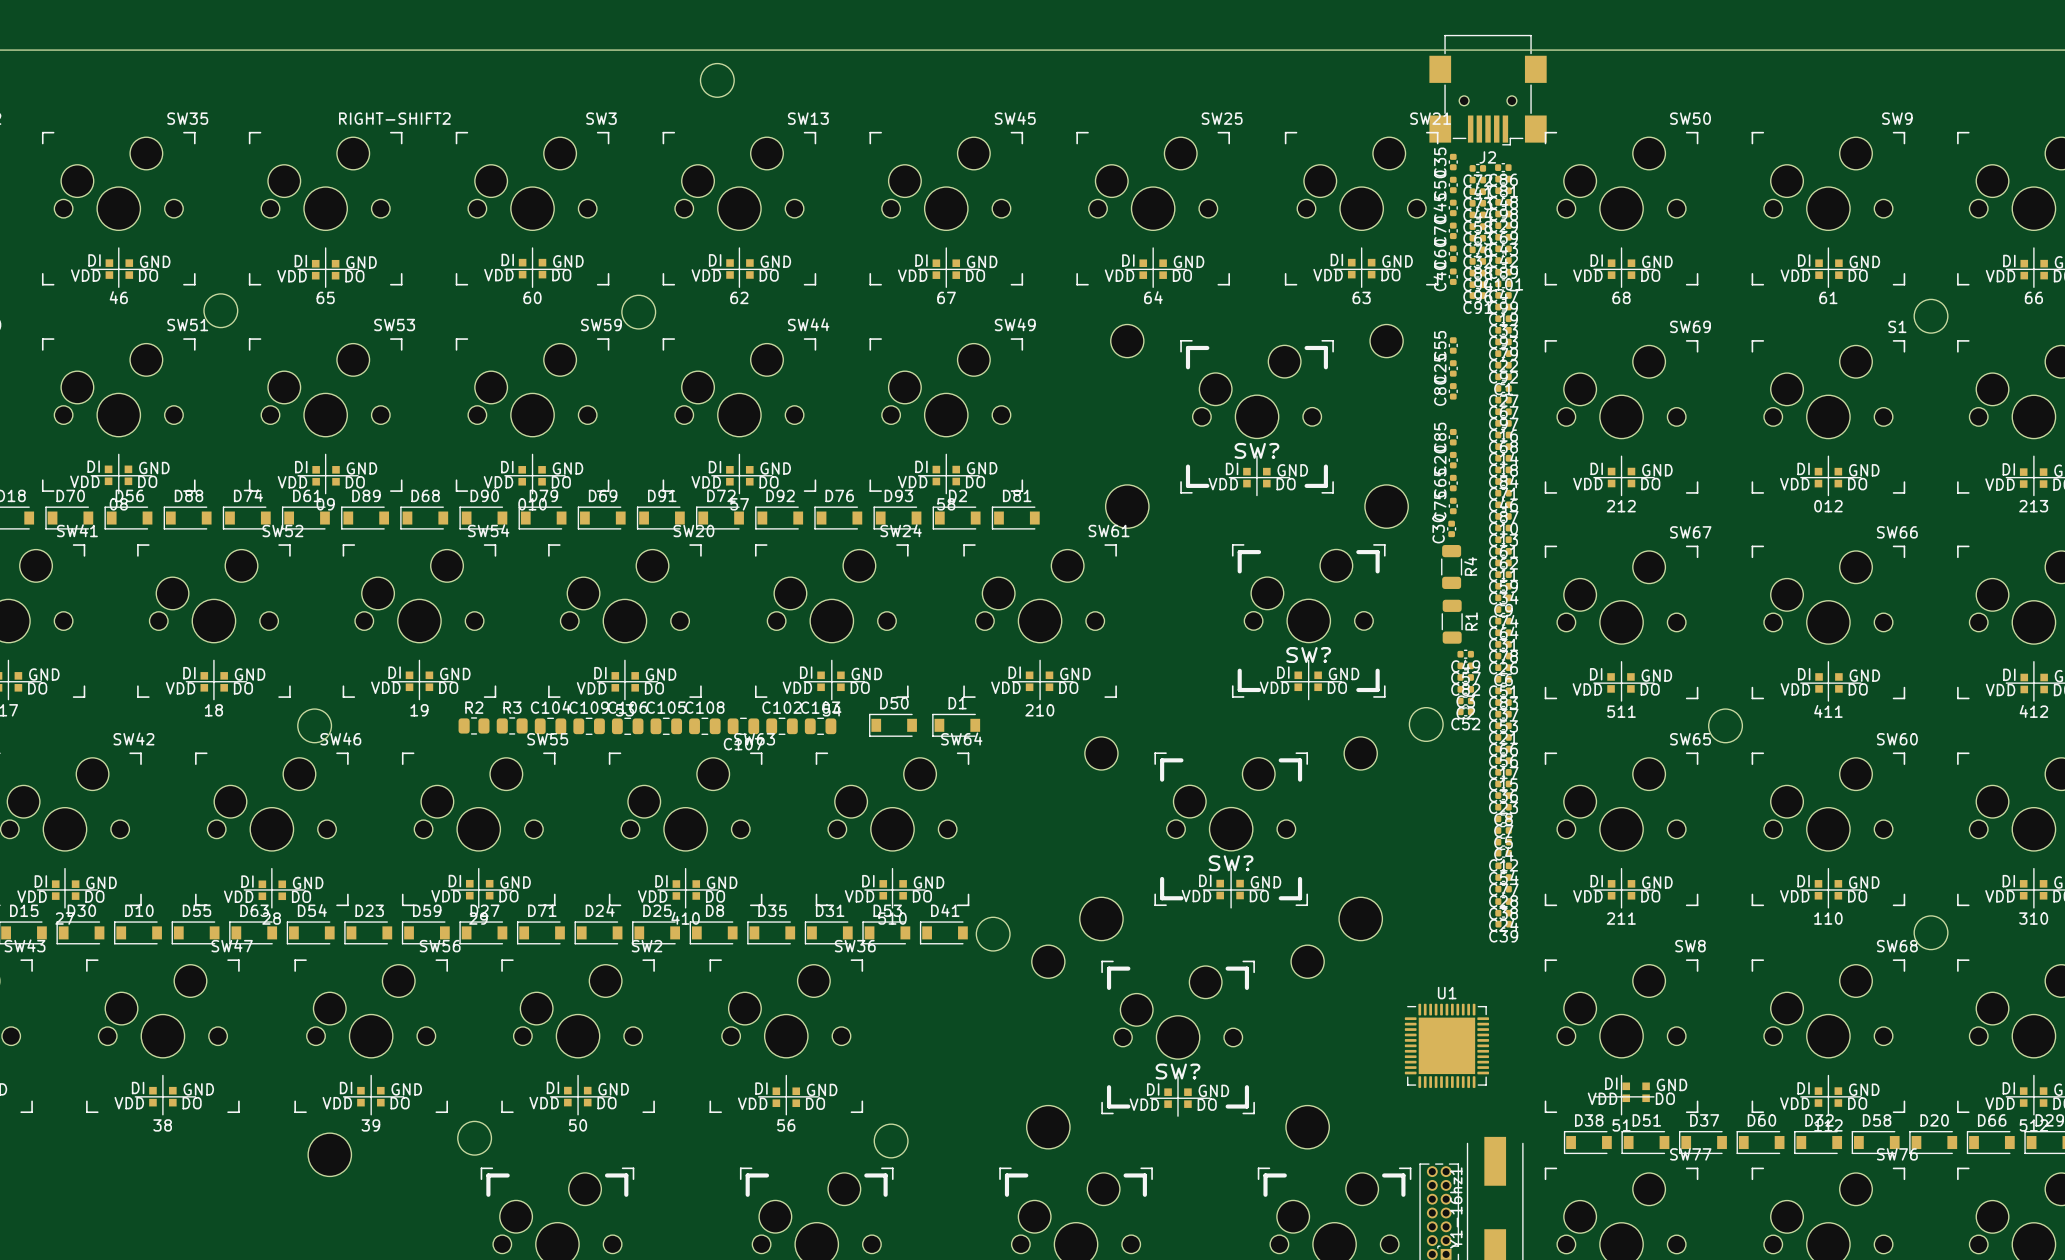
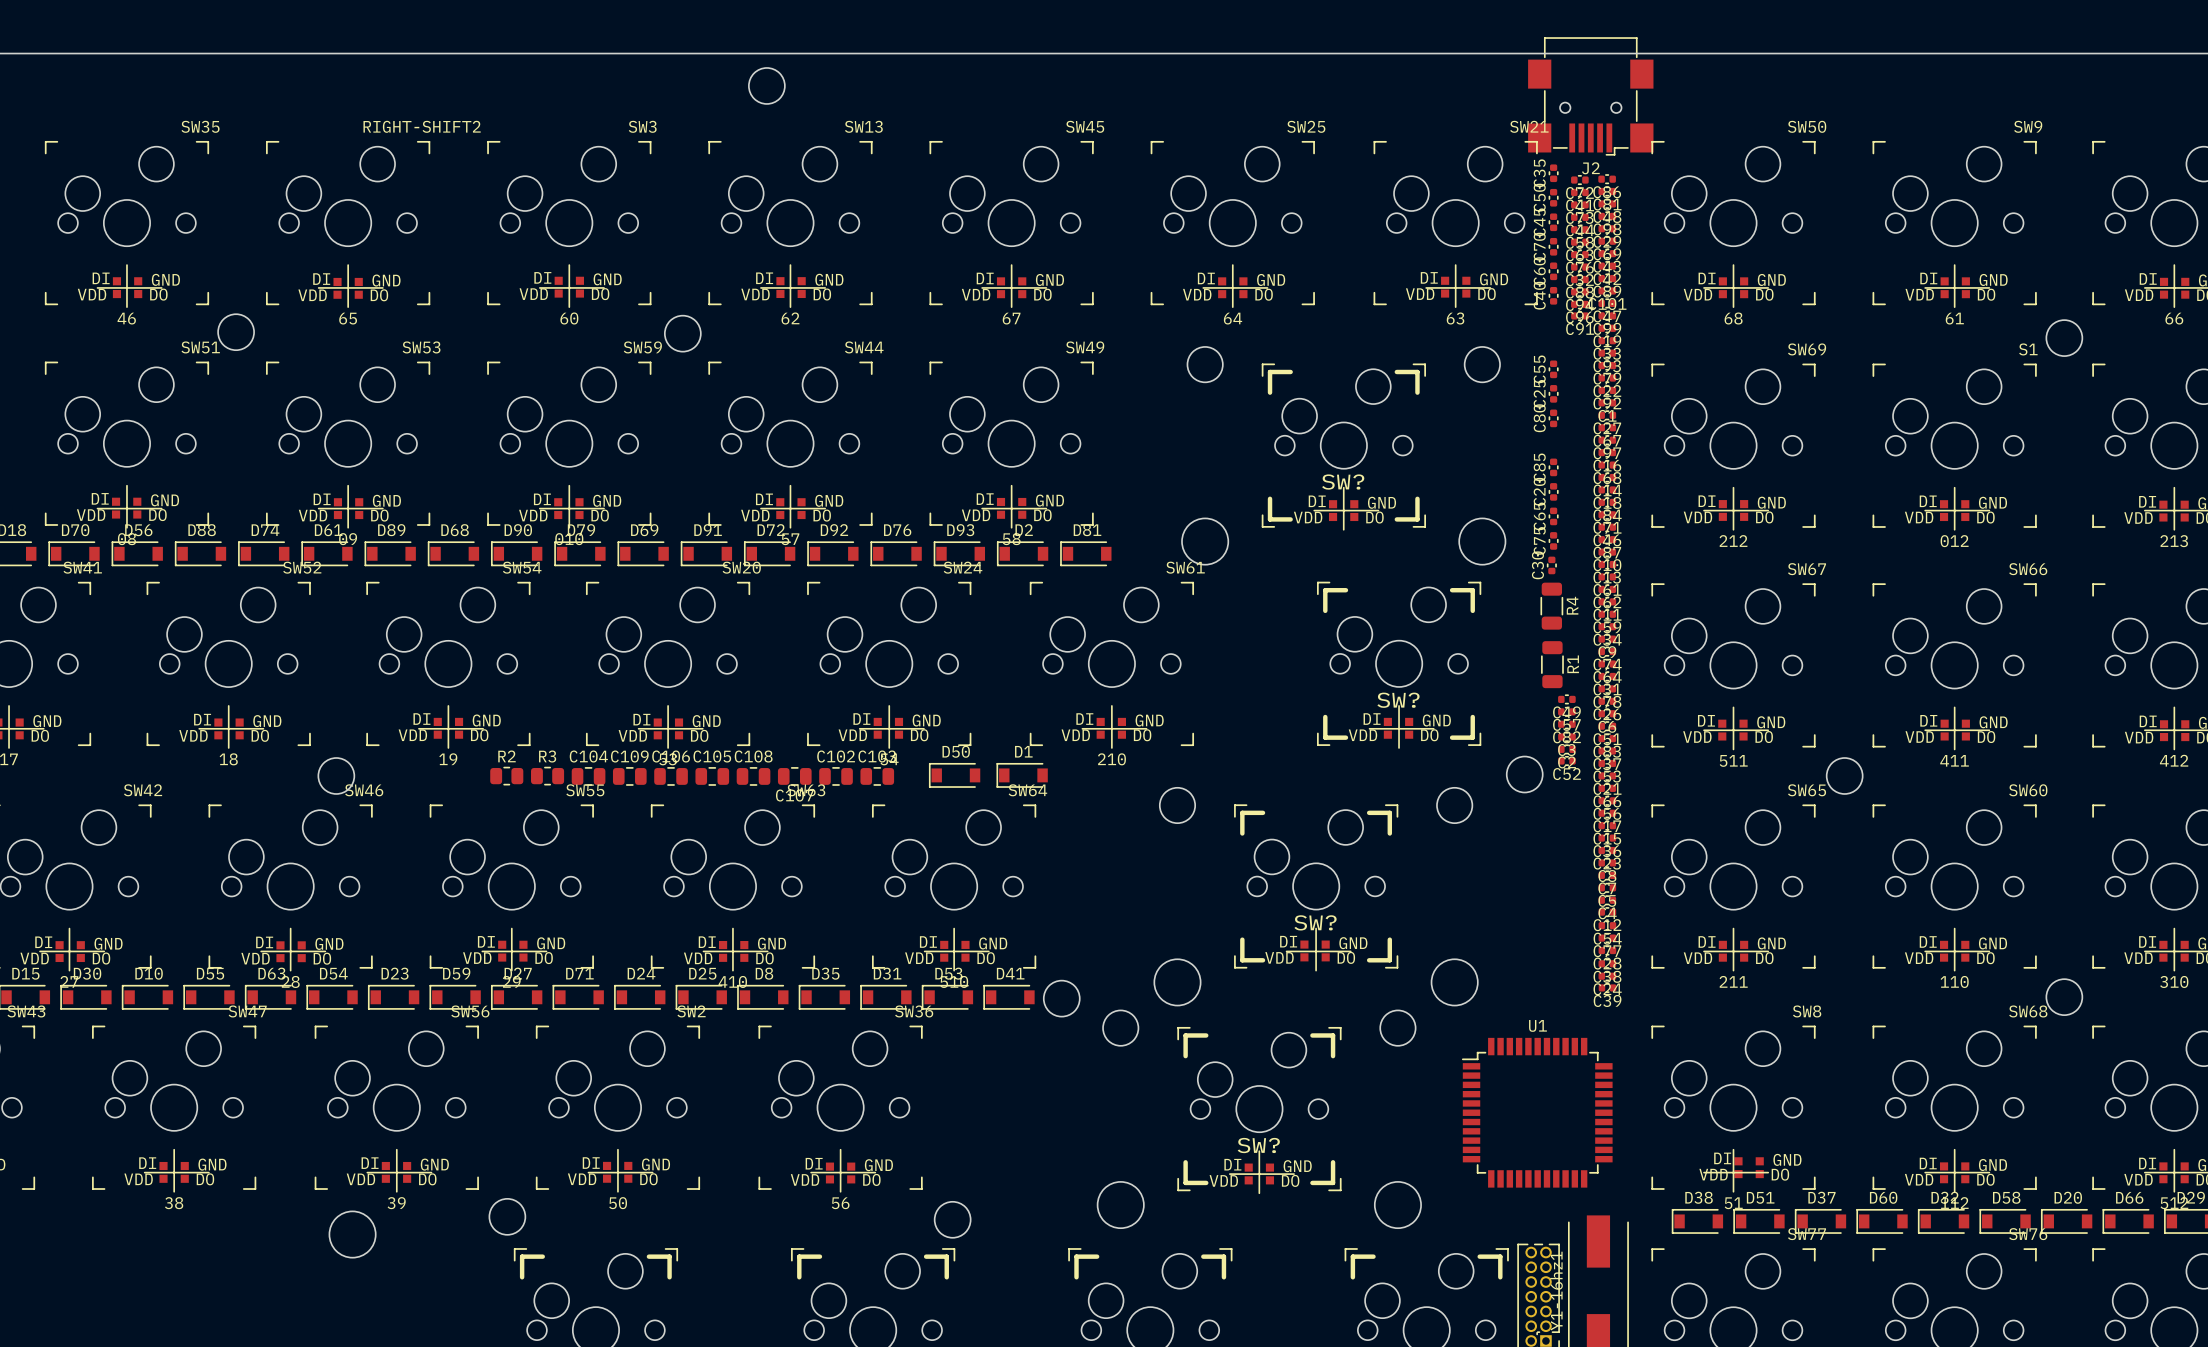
U1 name position: U1 (1447, 993) -> U1 (1537, 1025)
U1 footprint: [1404, 1003, 1490, 1088] -> [1461, 1037, 1613, 1188]

